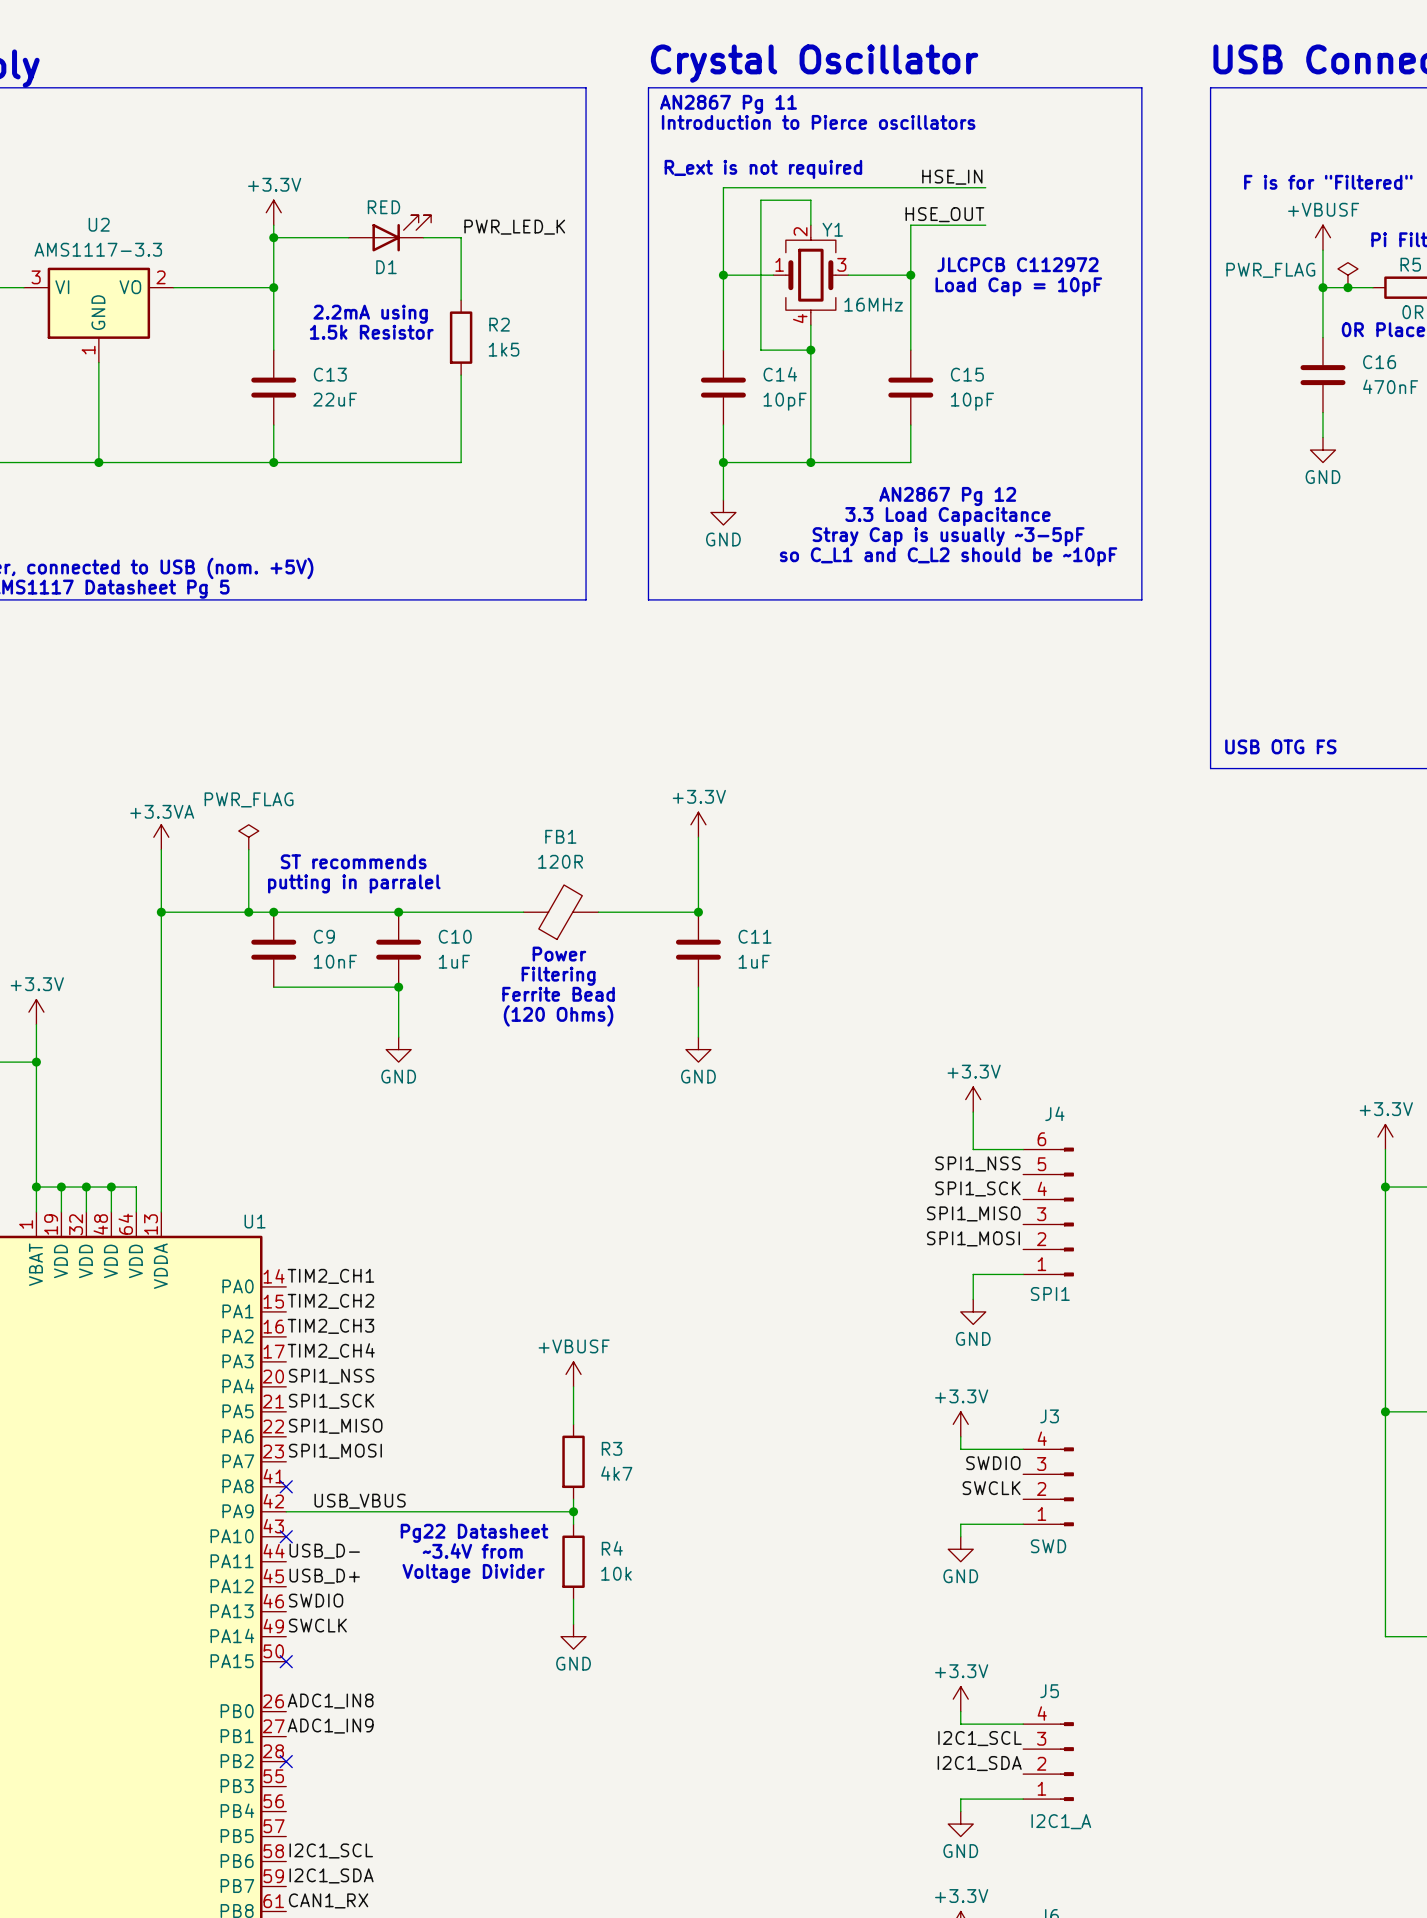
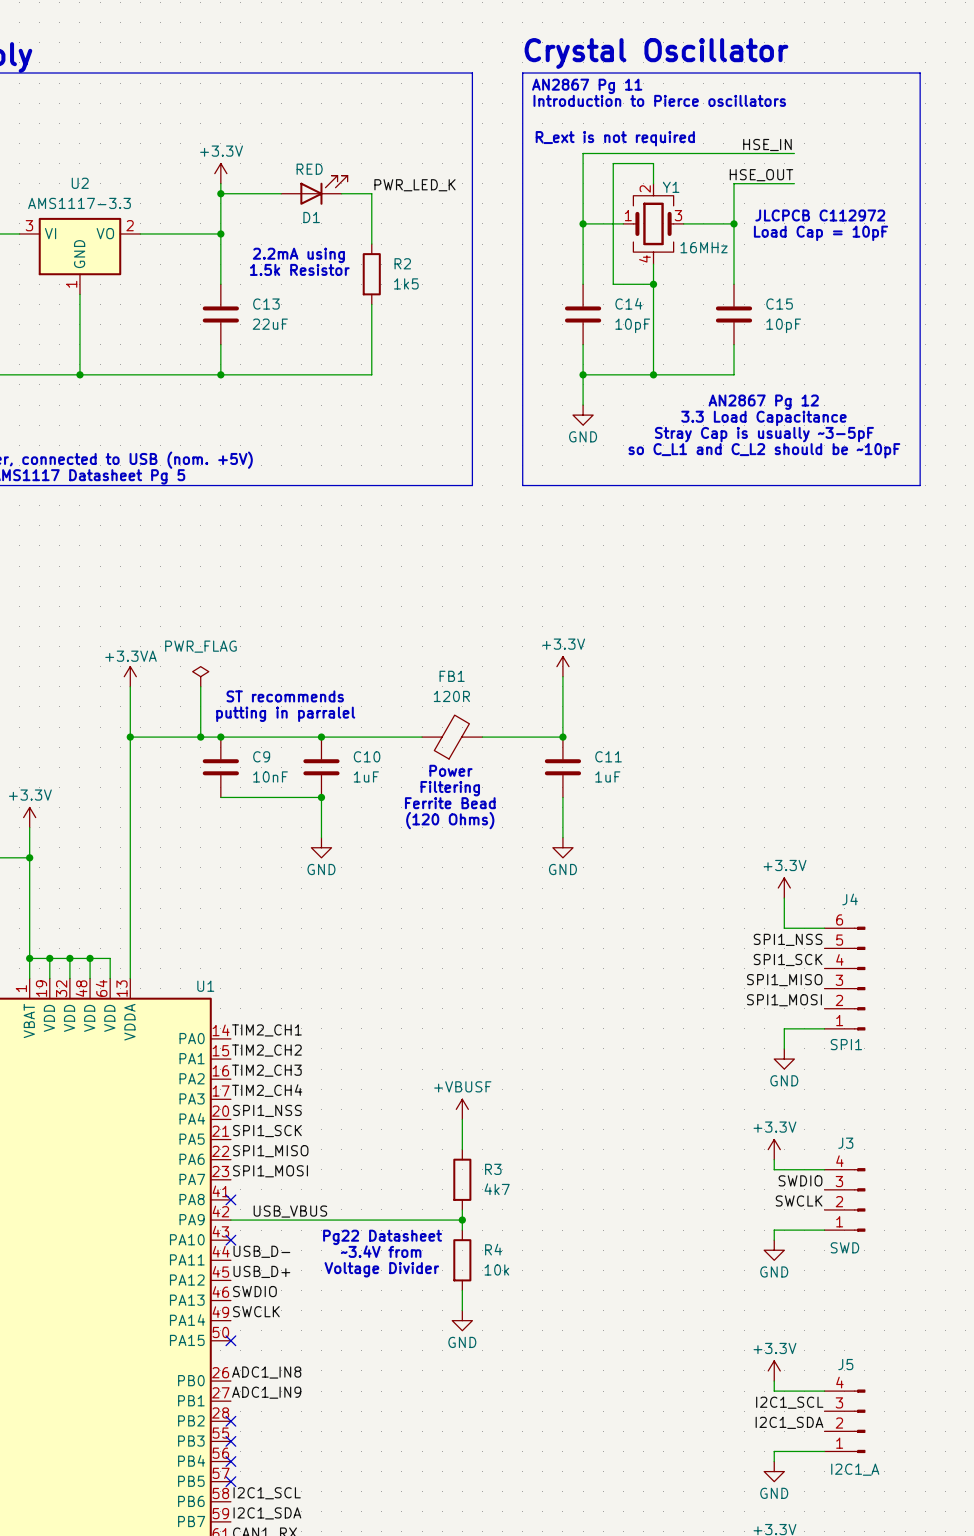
no-connect mark: none -> (230, 1441)
no-connect mark: none -> (230, 1461)
no-connect mark: none -> (230, 1481)

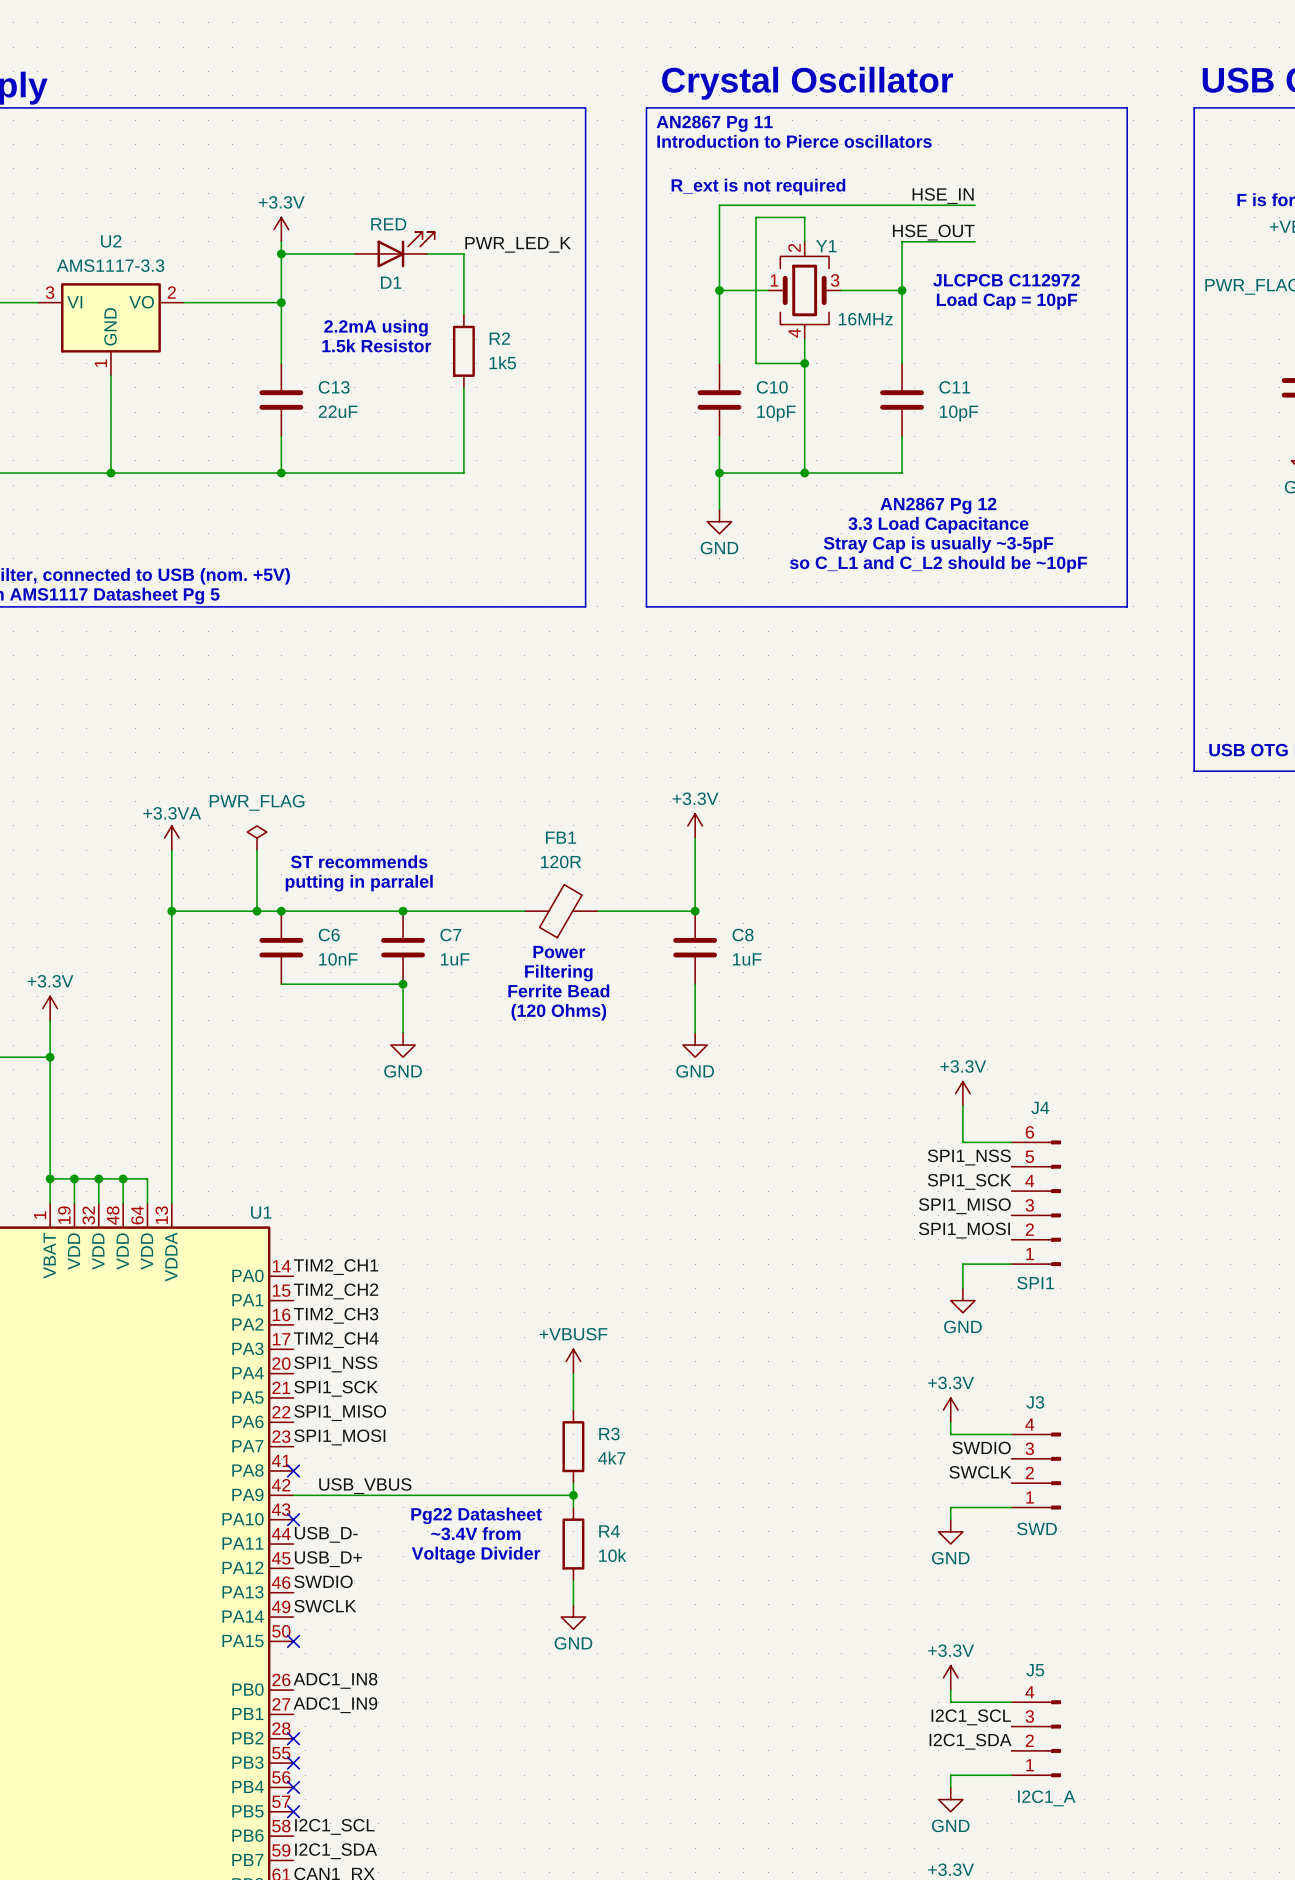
C14 name: C14 (628, 303) -> C10 (772, 387)
C15 name: C15 (779, 304) -> C11 (954, 387)
C9 name: C9 (261, 756) -> C6 (329, 935)
C10 name: C10 (367, 756) -> C7 (450, 935)
C11 name: C11 (608, 756) -> C8 (743, 935)

